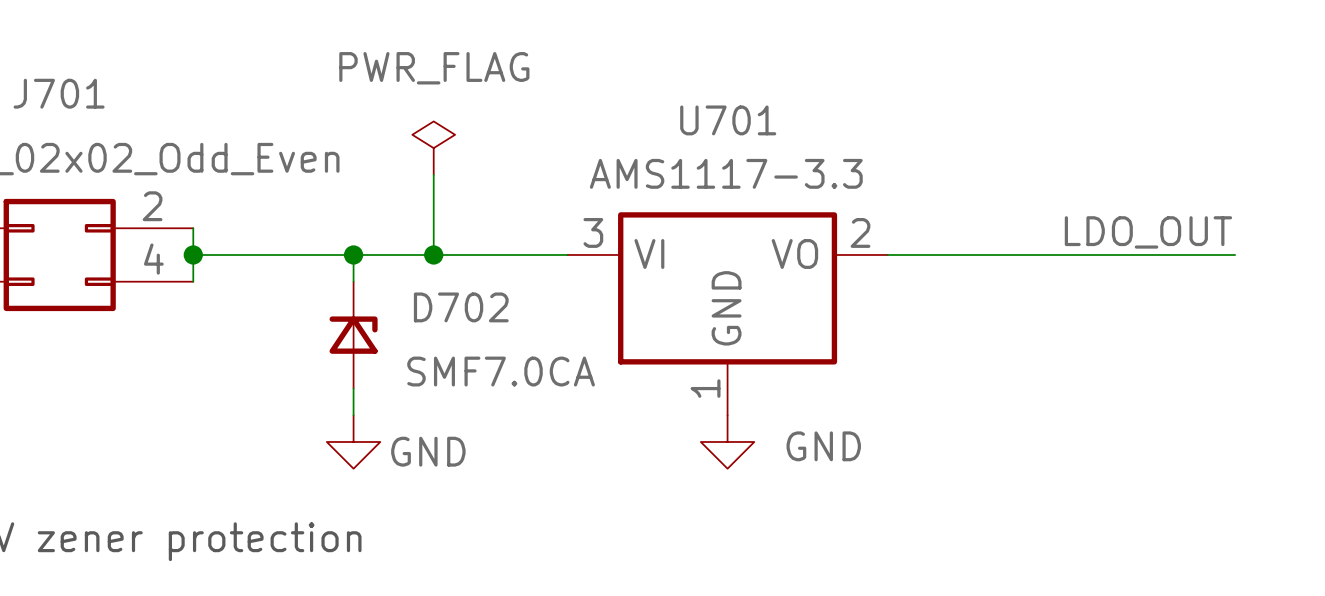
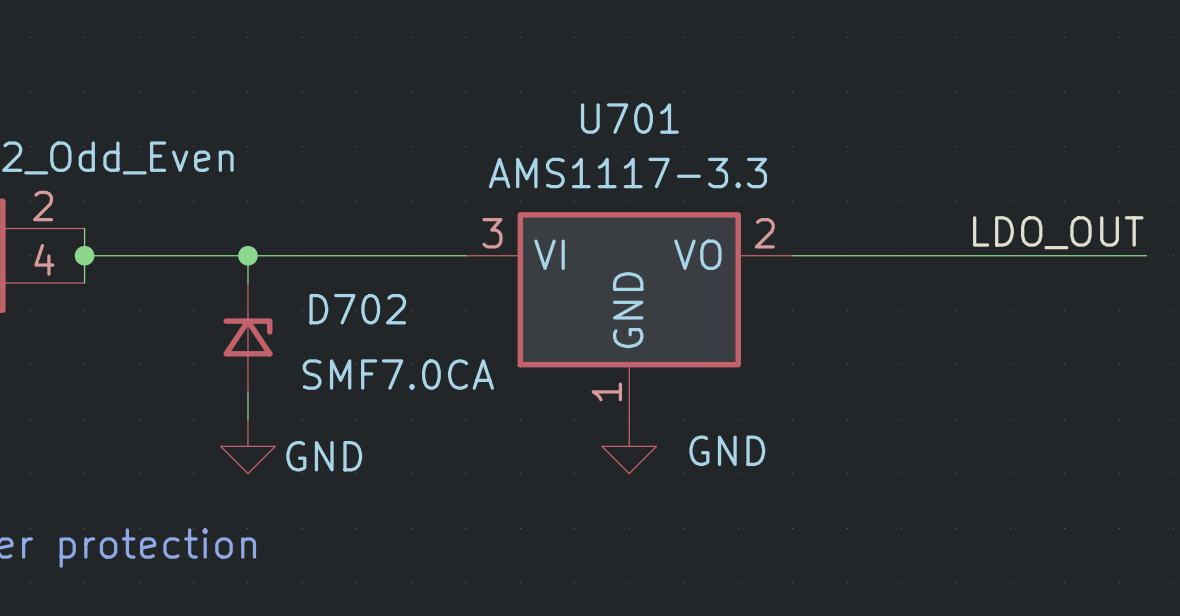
power symbol: PWR_FLAG (433, 148) -> none
wire: (433, 174) (433, 254) -> none
junction: (433, 254) -> none

